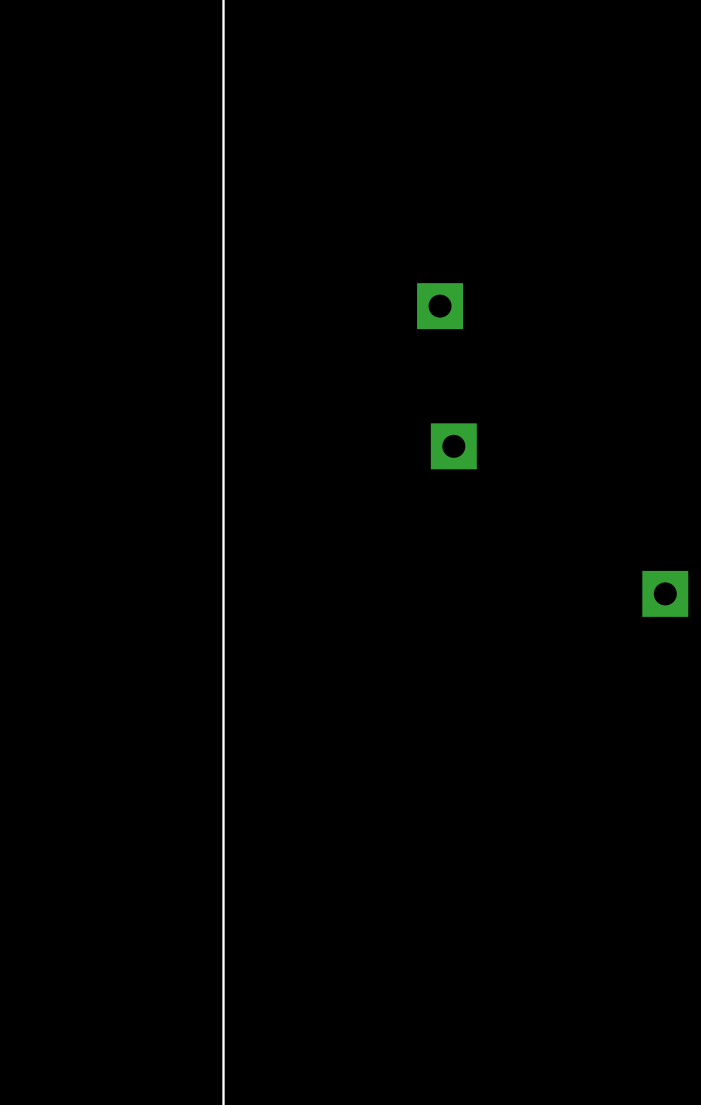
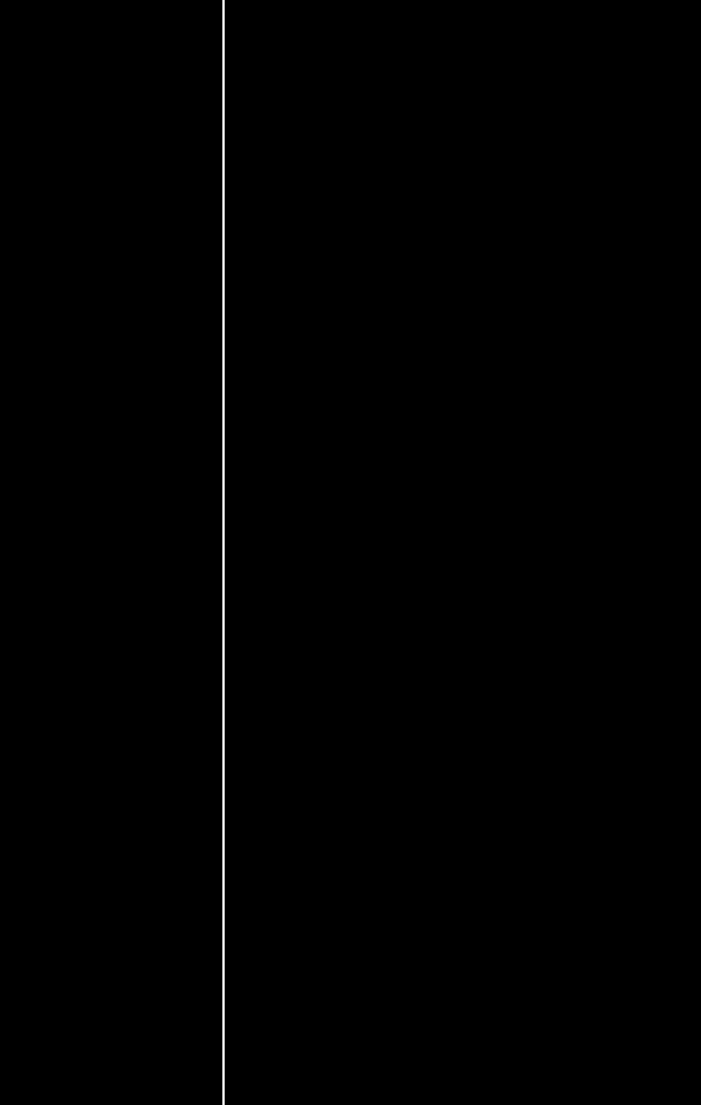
part: (440, 306) -> none
part: (453, 446) -> none
part: (665, 593) -> none

